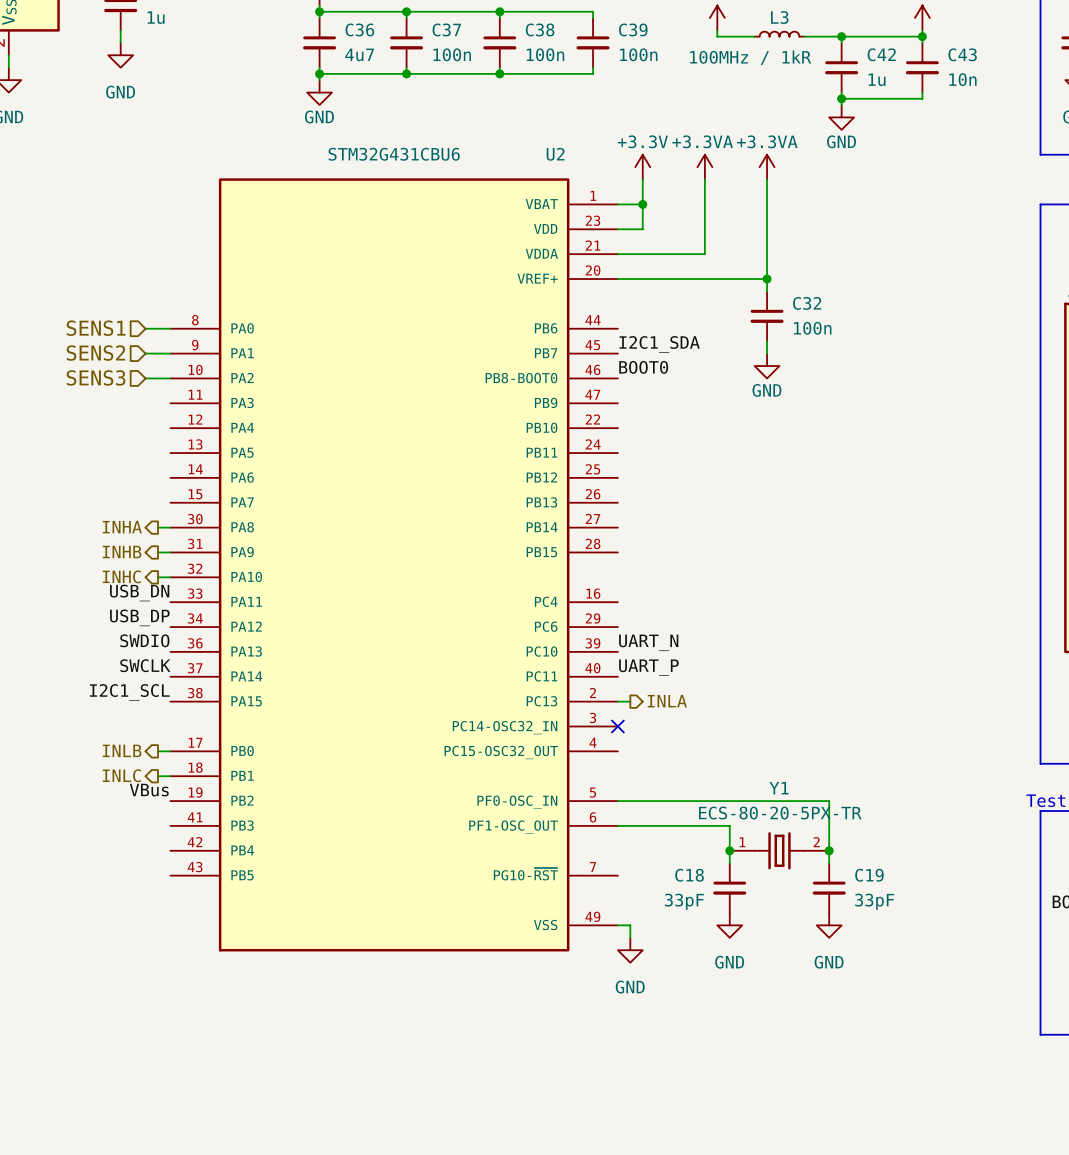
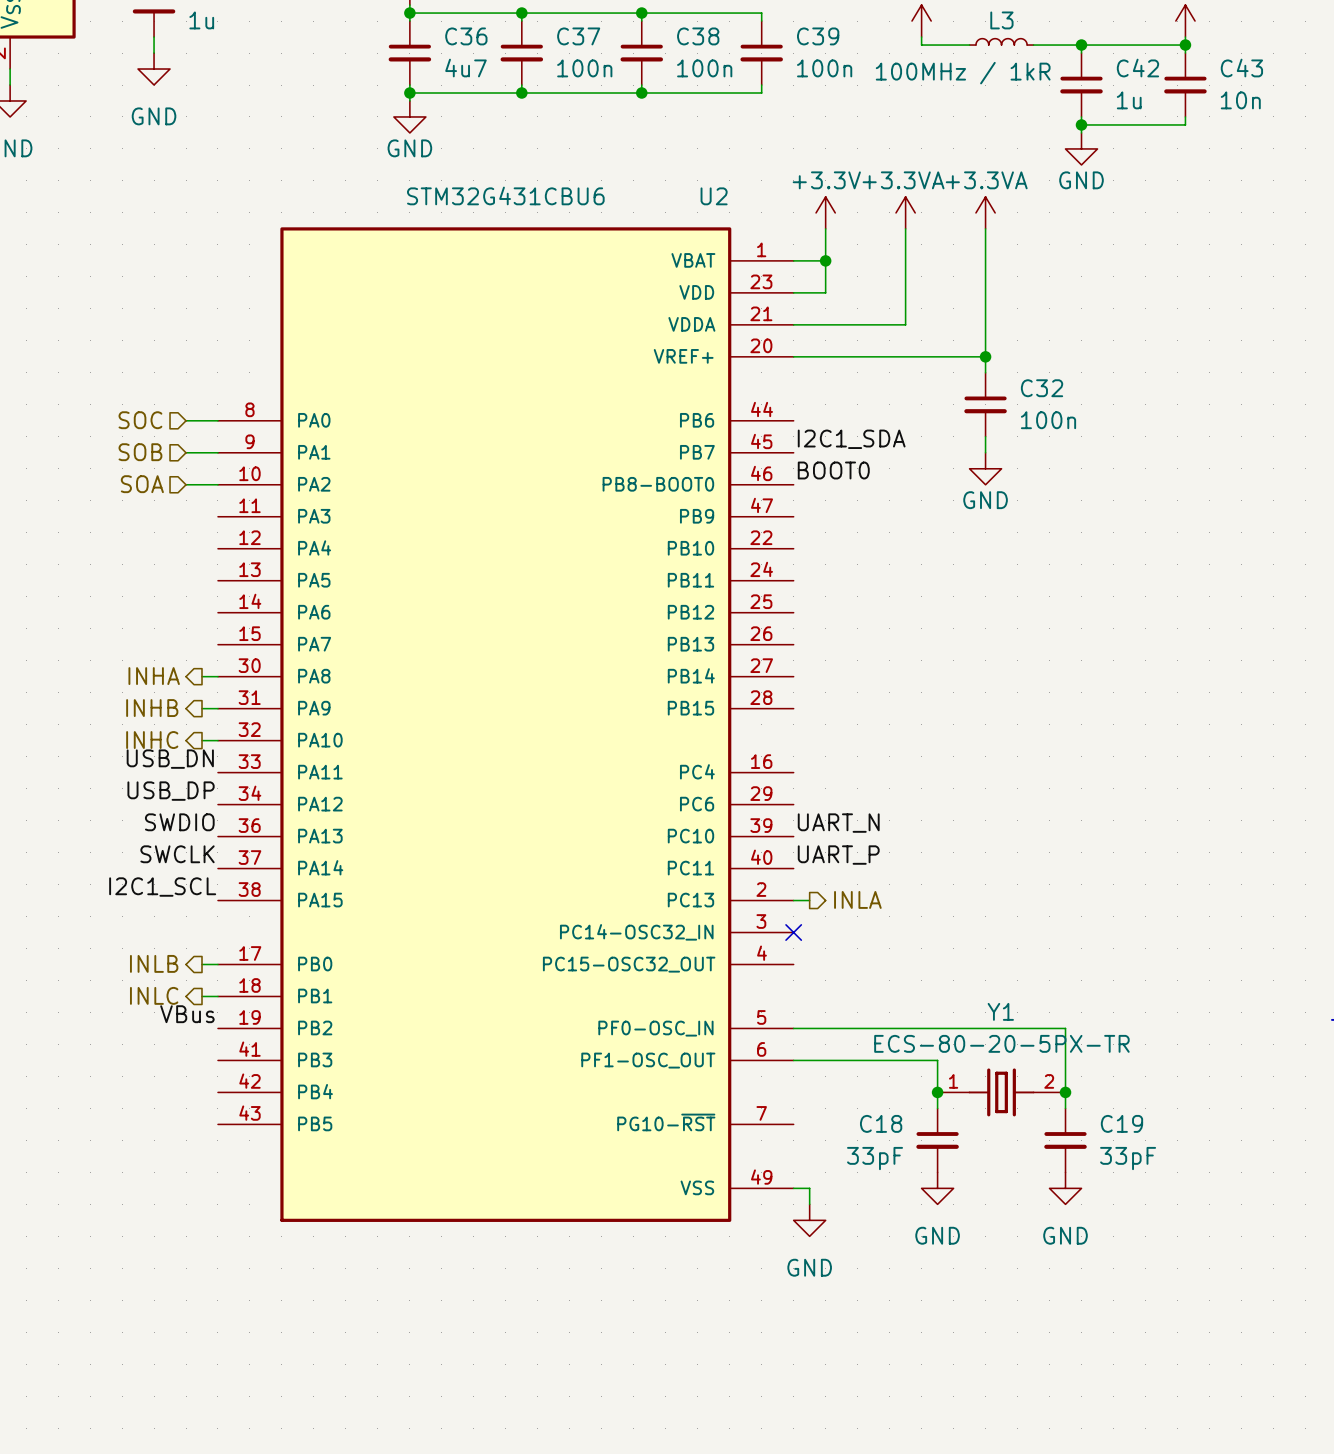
hierarchical label: SENS1 (96, 328) -> SOC (140, 420)
hierarchical label: SENS2 (95, 353) -> SOB (140, 452)
hierarchical label: SENS3 (96, 377) -> SOA (142, 484)

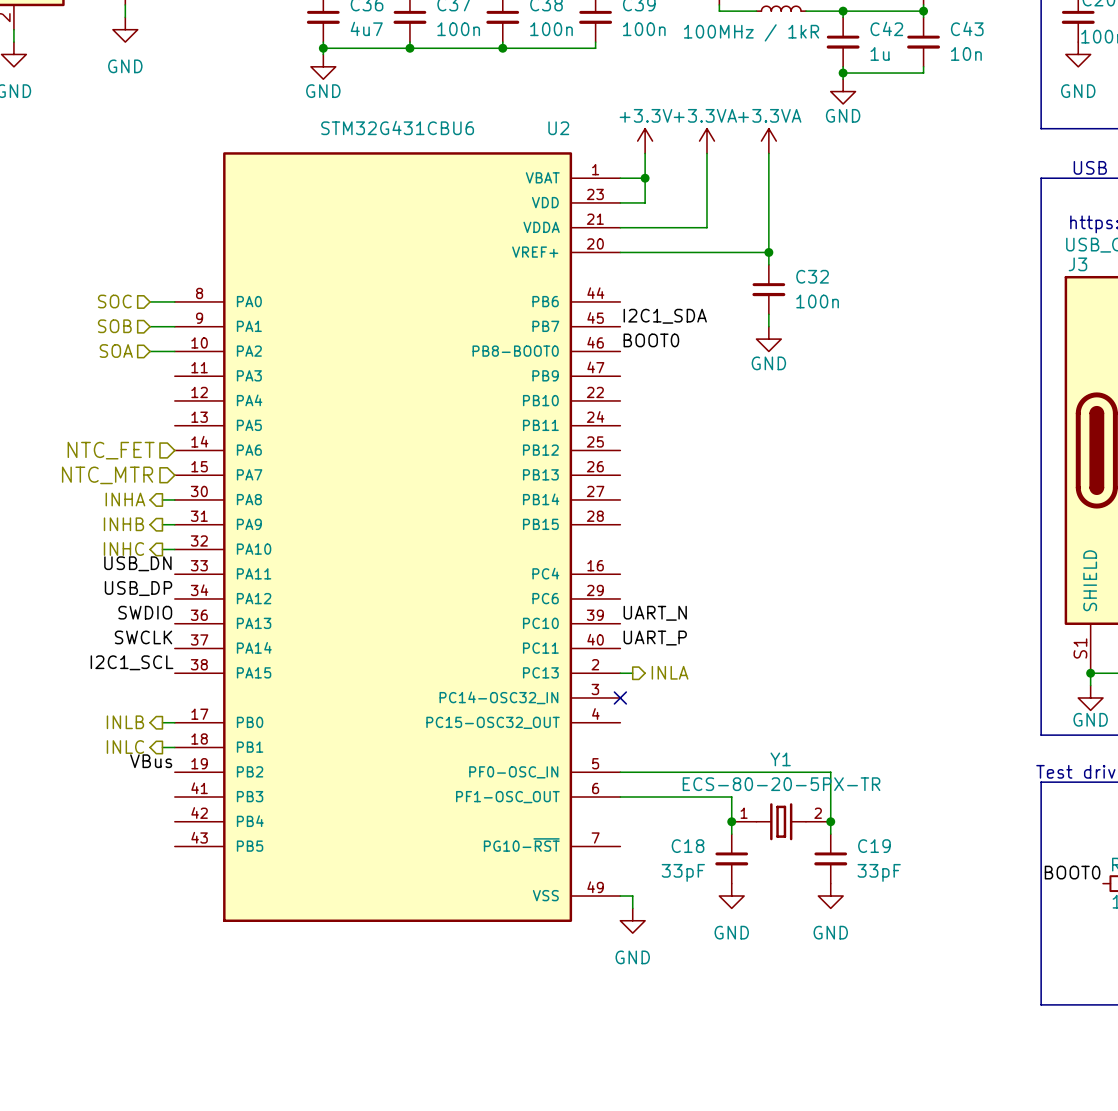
hierarchical label: none -> NTC_FET (111, 450)
hierarchical label: none -> NTC_MTR (107, 475)

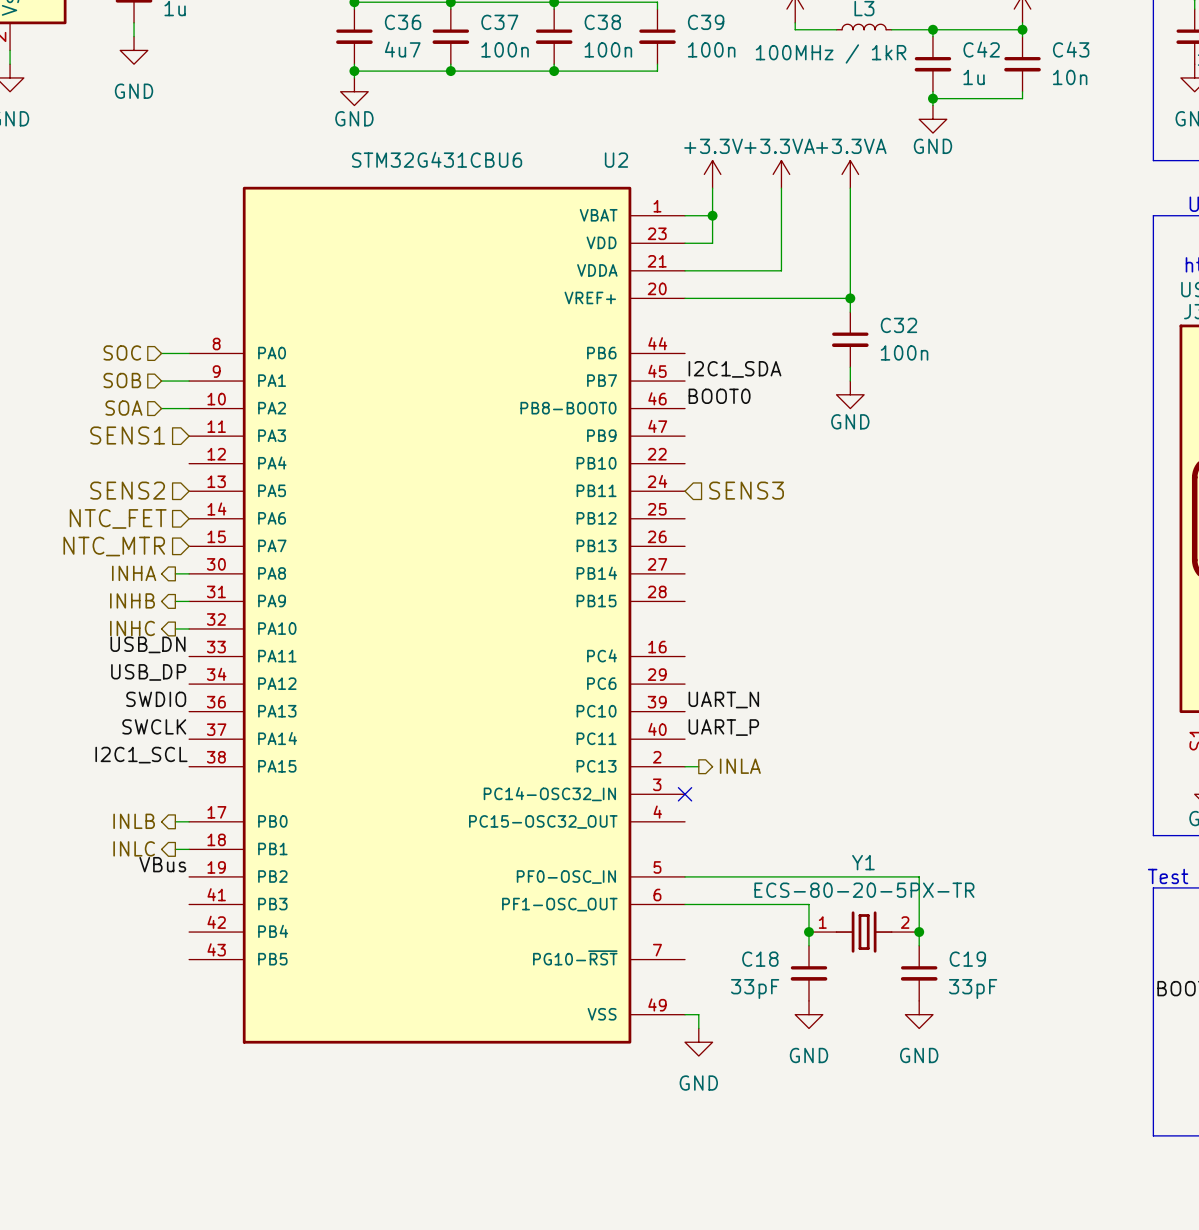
hierarchical label: none -> SENS1 (127, 435)
hierarchical label: none -> SENS2 (127, 490)
hierarchical label: none -> SENS3 (746, 490)

